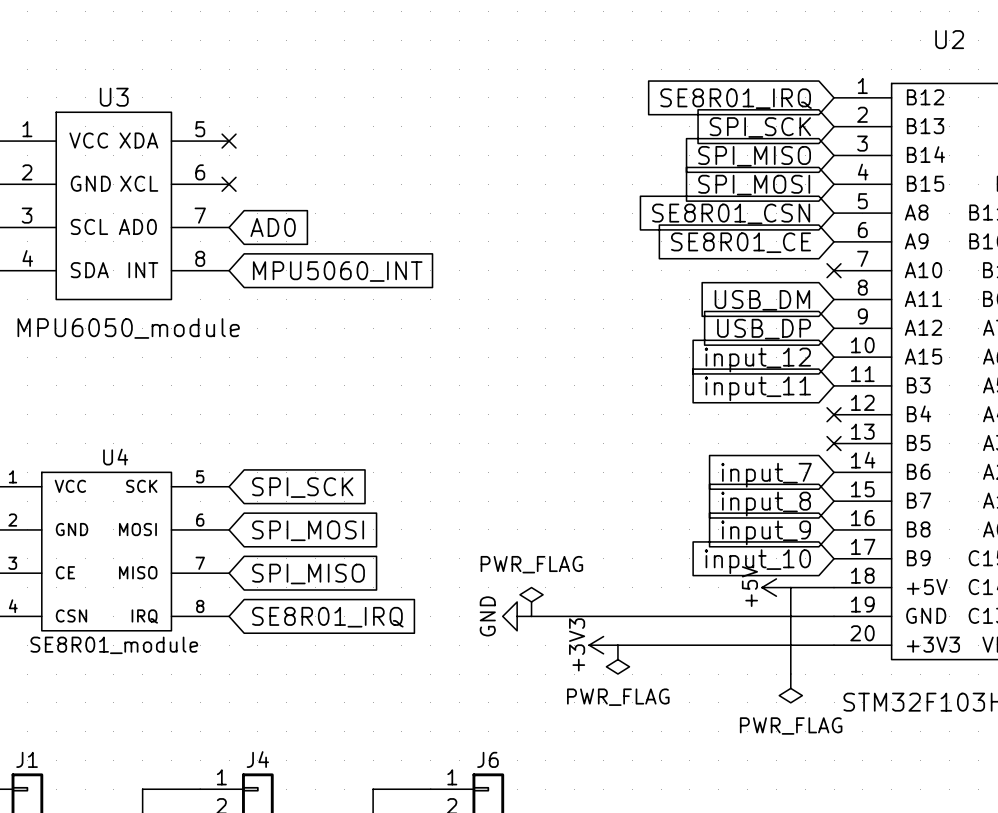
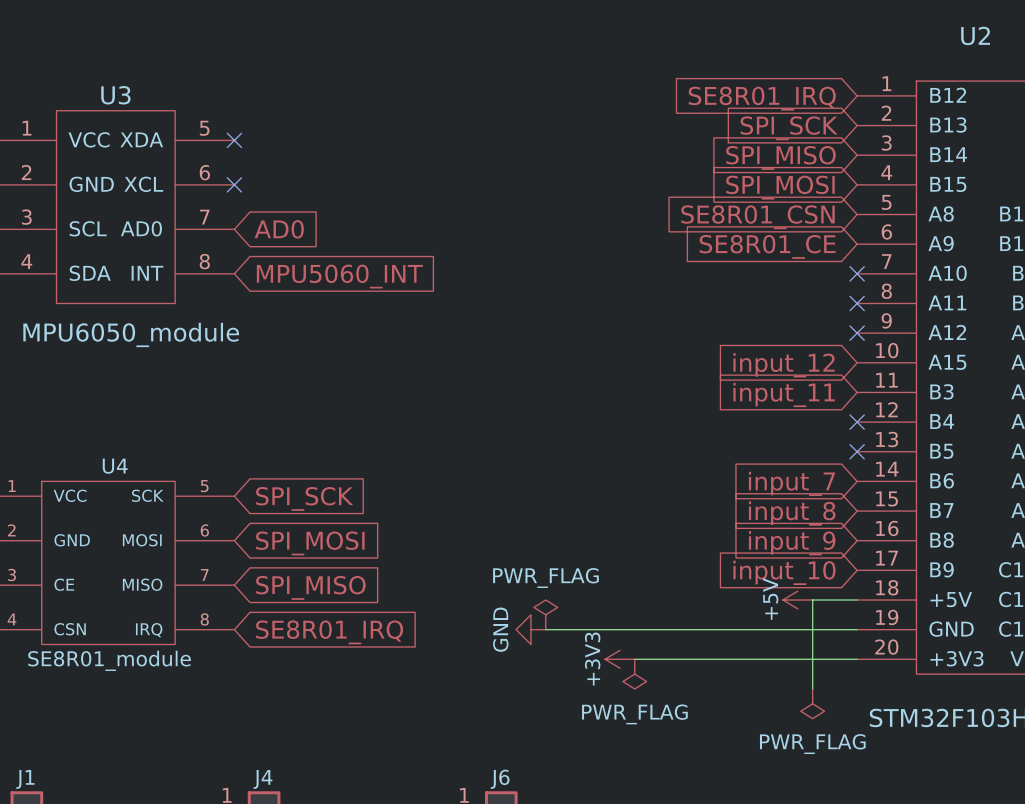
no-connect mark: none -> (857, 303)
global label: USB_DM (762, 300) -> none
no-connect mark: none -> (857, 333)
global label: USB_DP (764, 329) -> none

